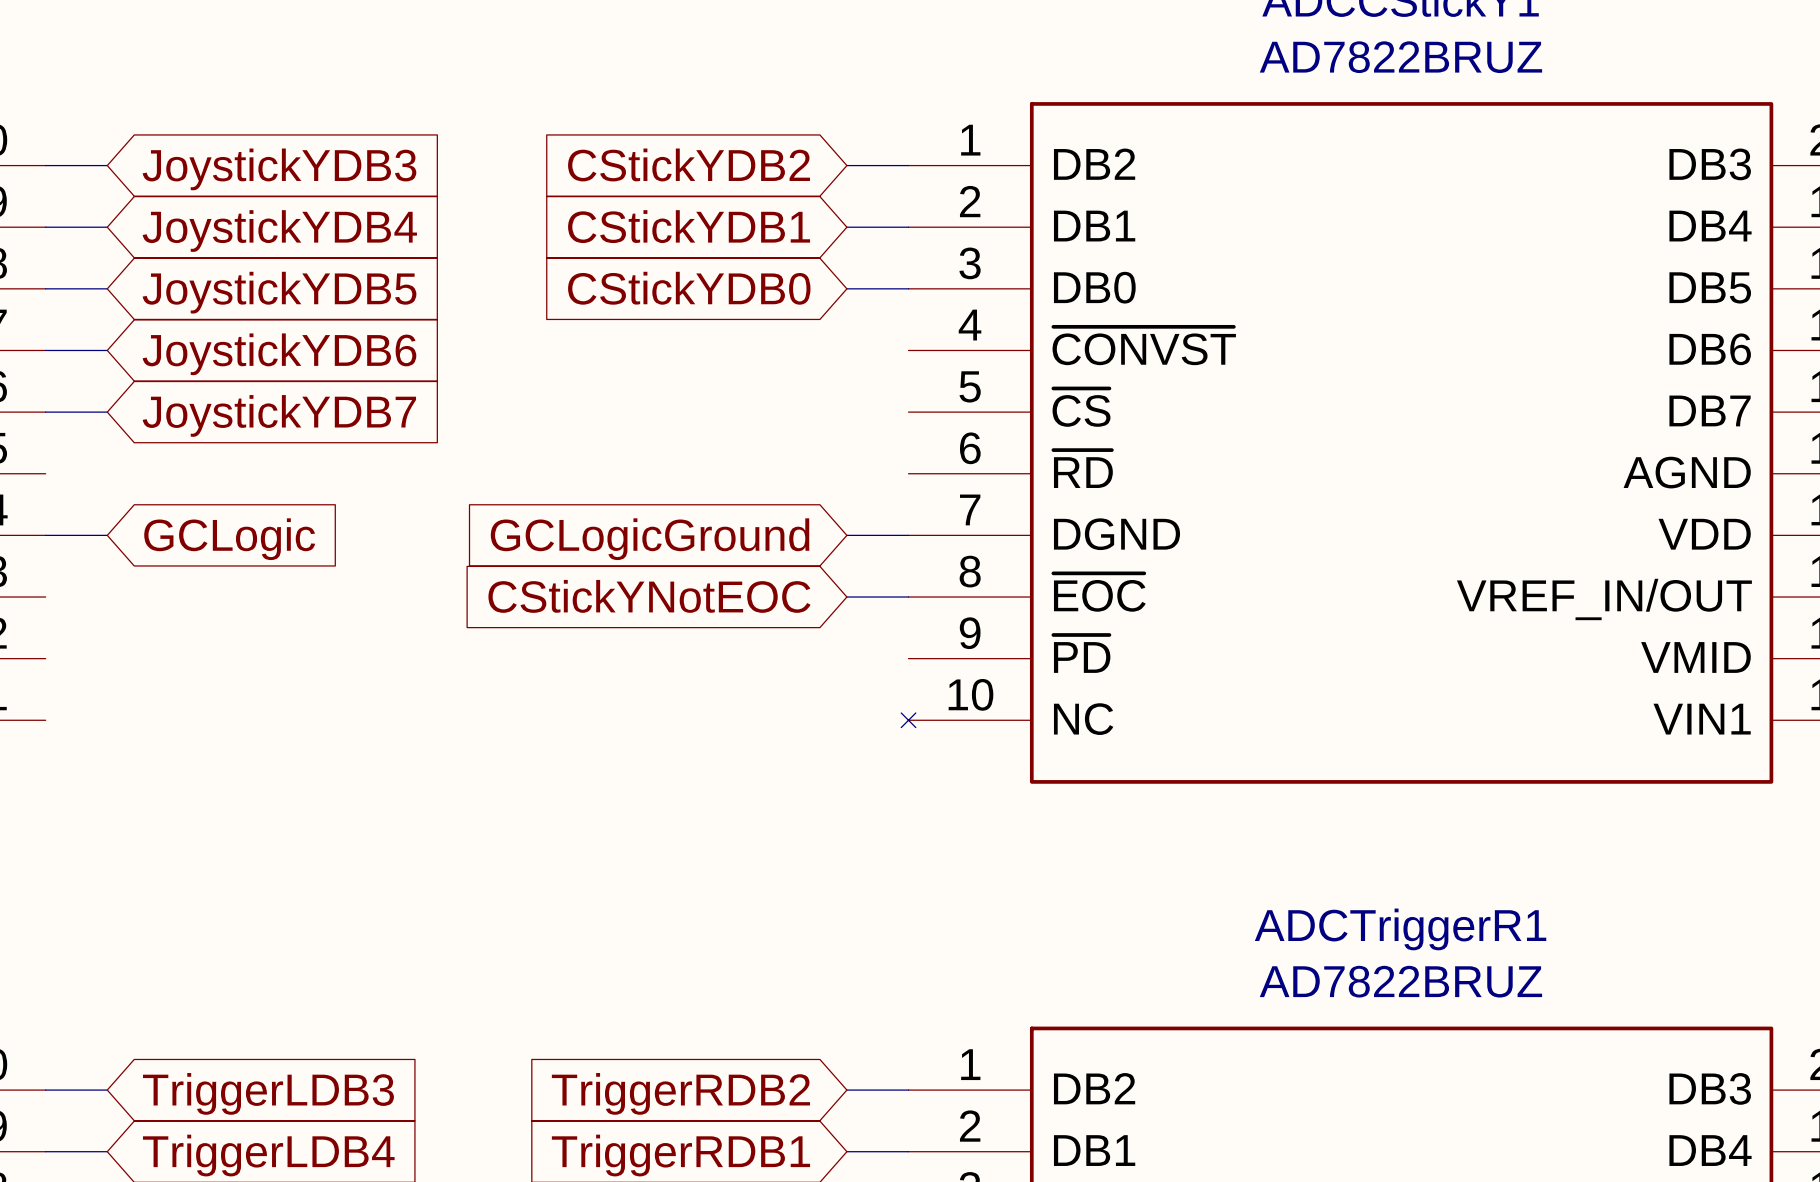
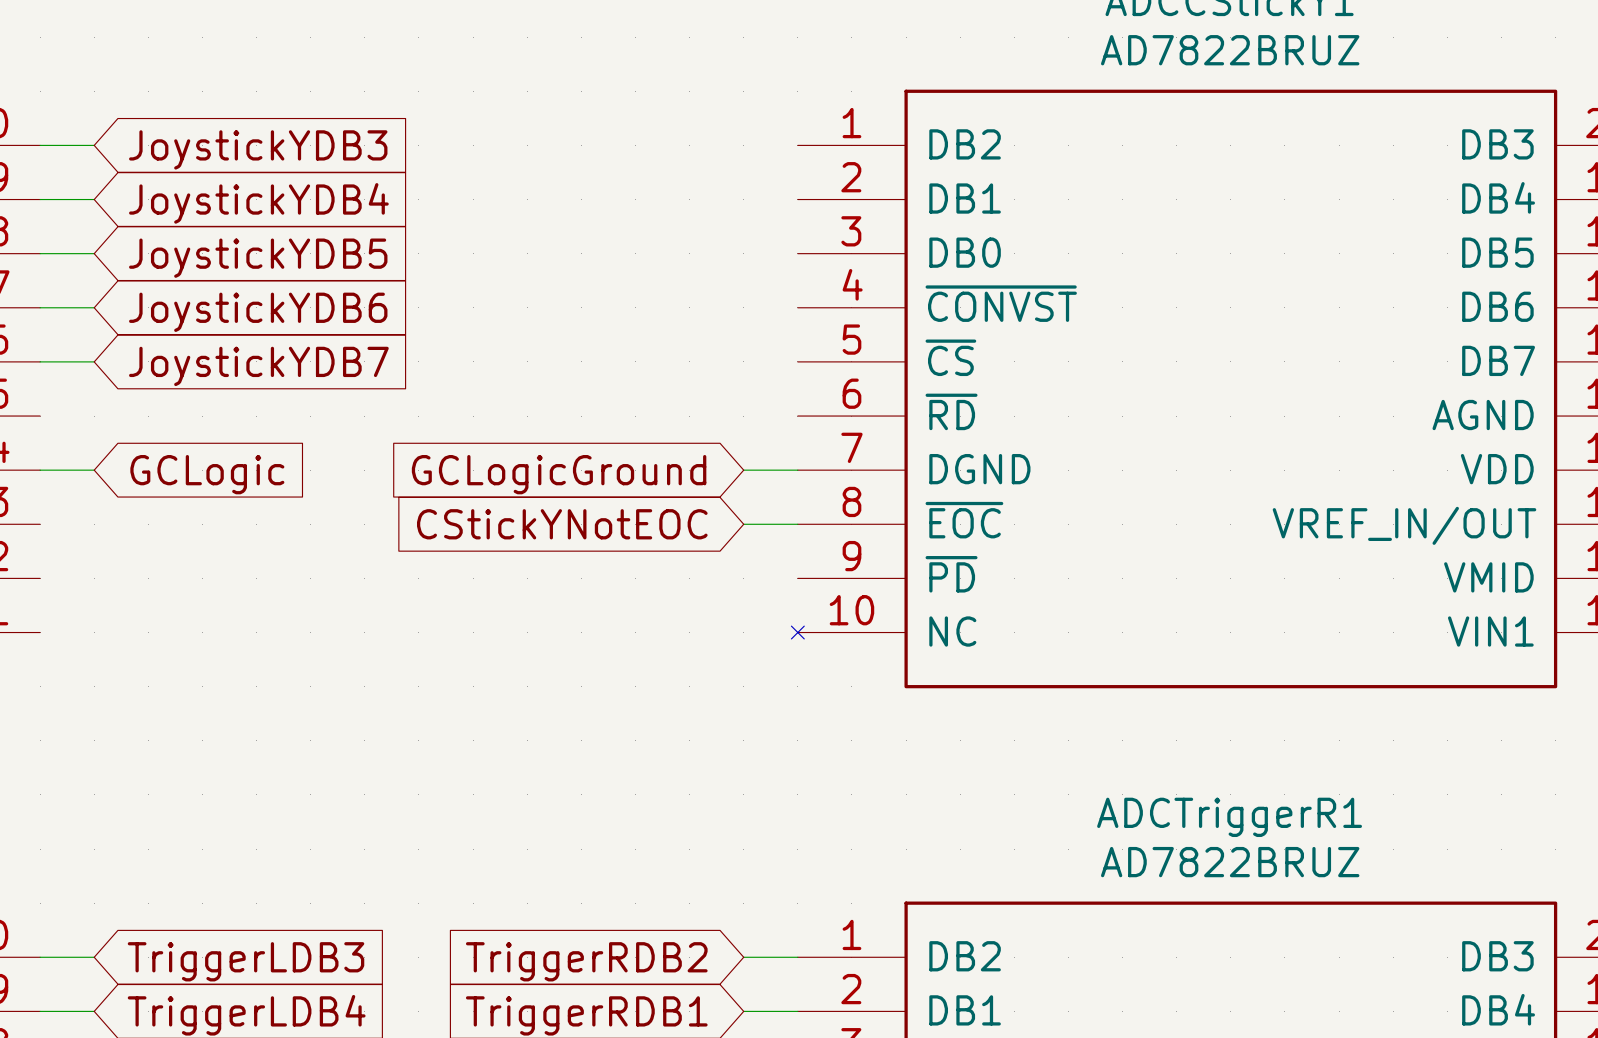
global label: CStickYDB2 (689, 164) -> none
wire: (846, 165) (908, 165) -> none
global label: CStickYDB1 (689, 226) -> none
wire: (846, 227) (908, 227) -> none
global label: CStickYDB0 (689, 288) -> none
wire: (846, 288) (908, 288) -> none

